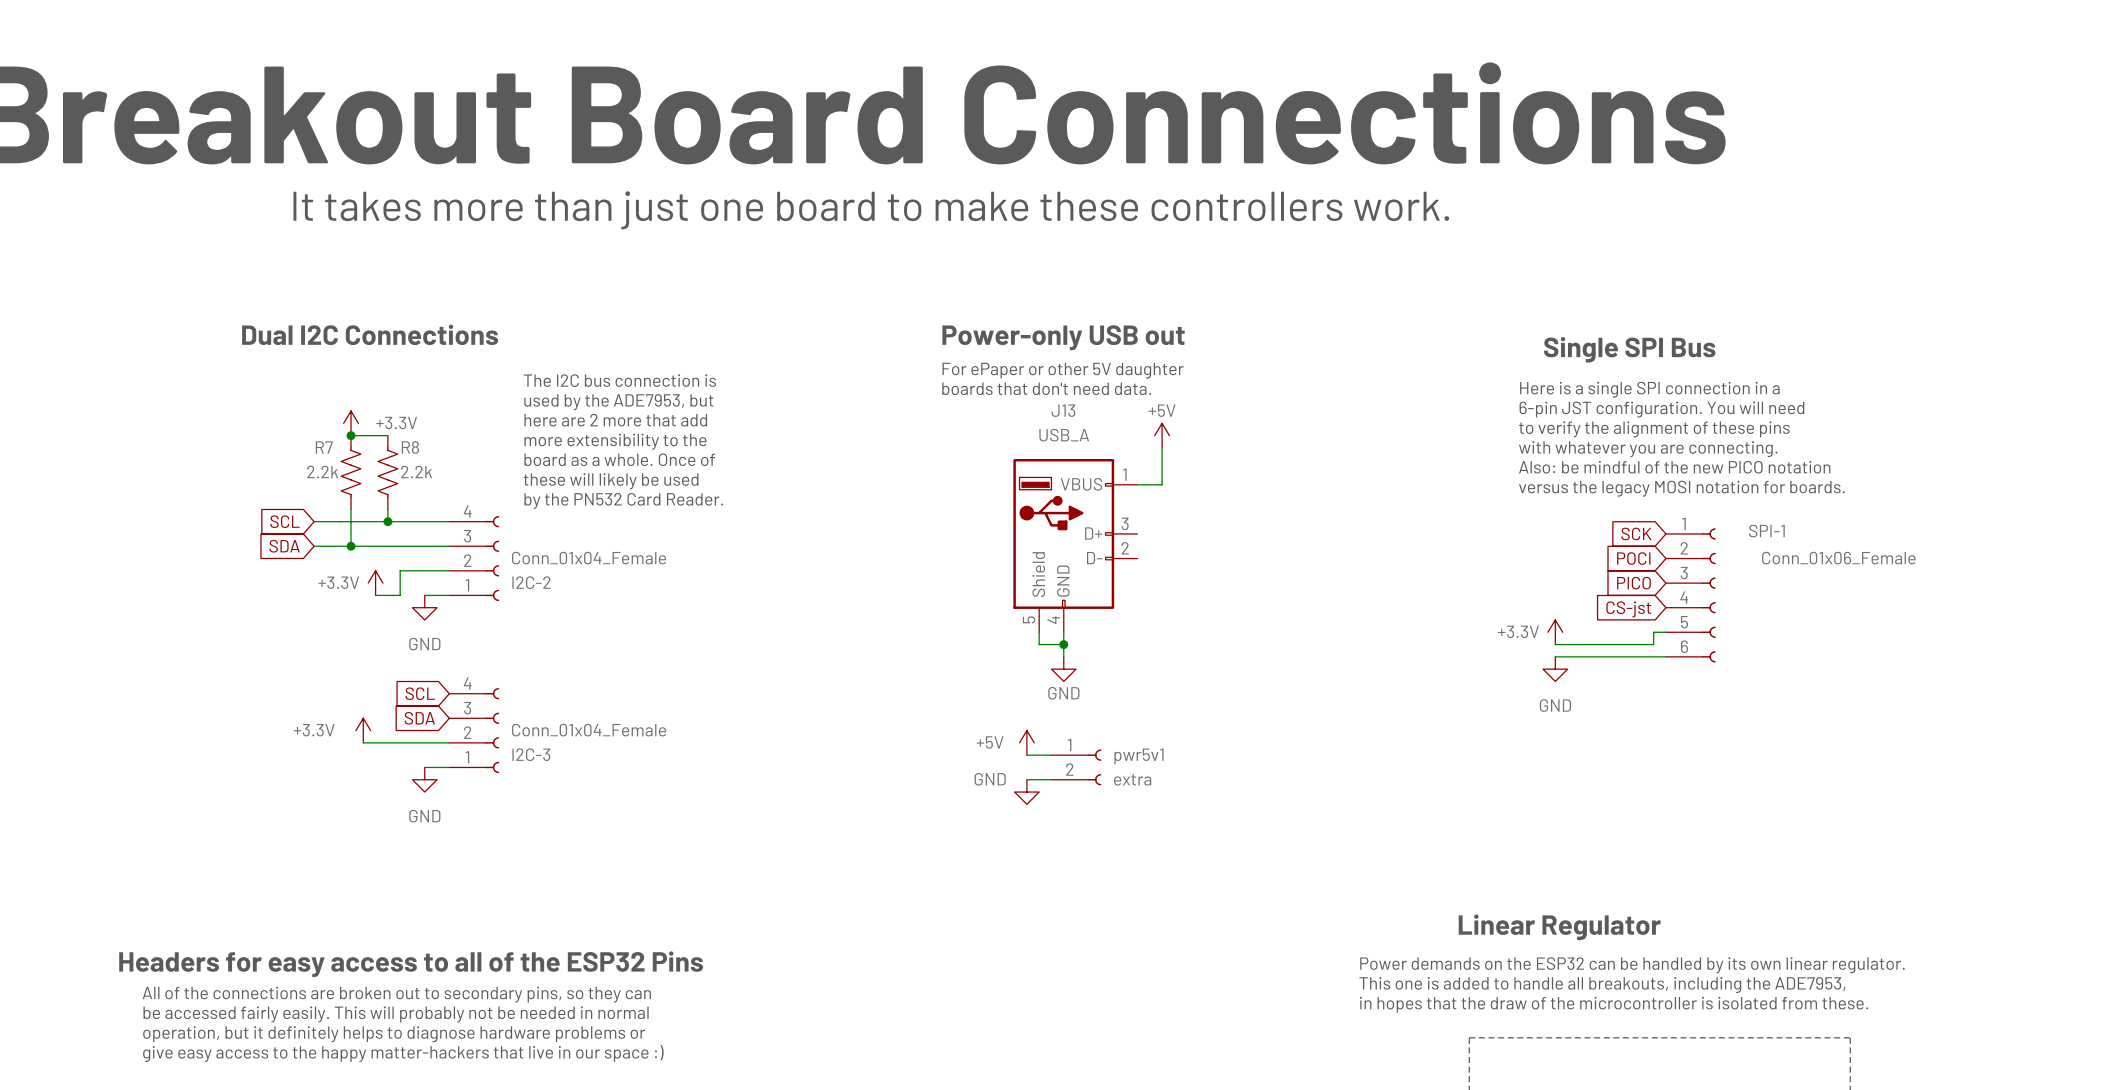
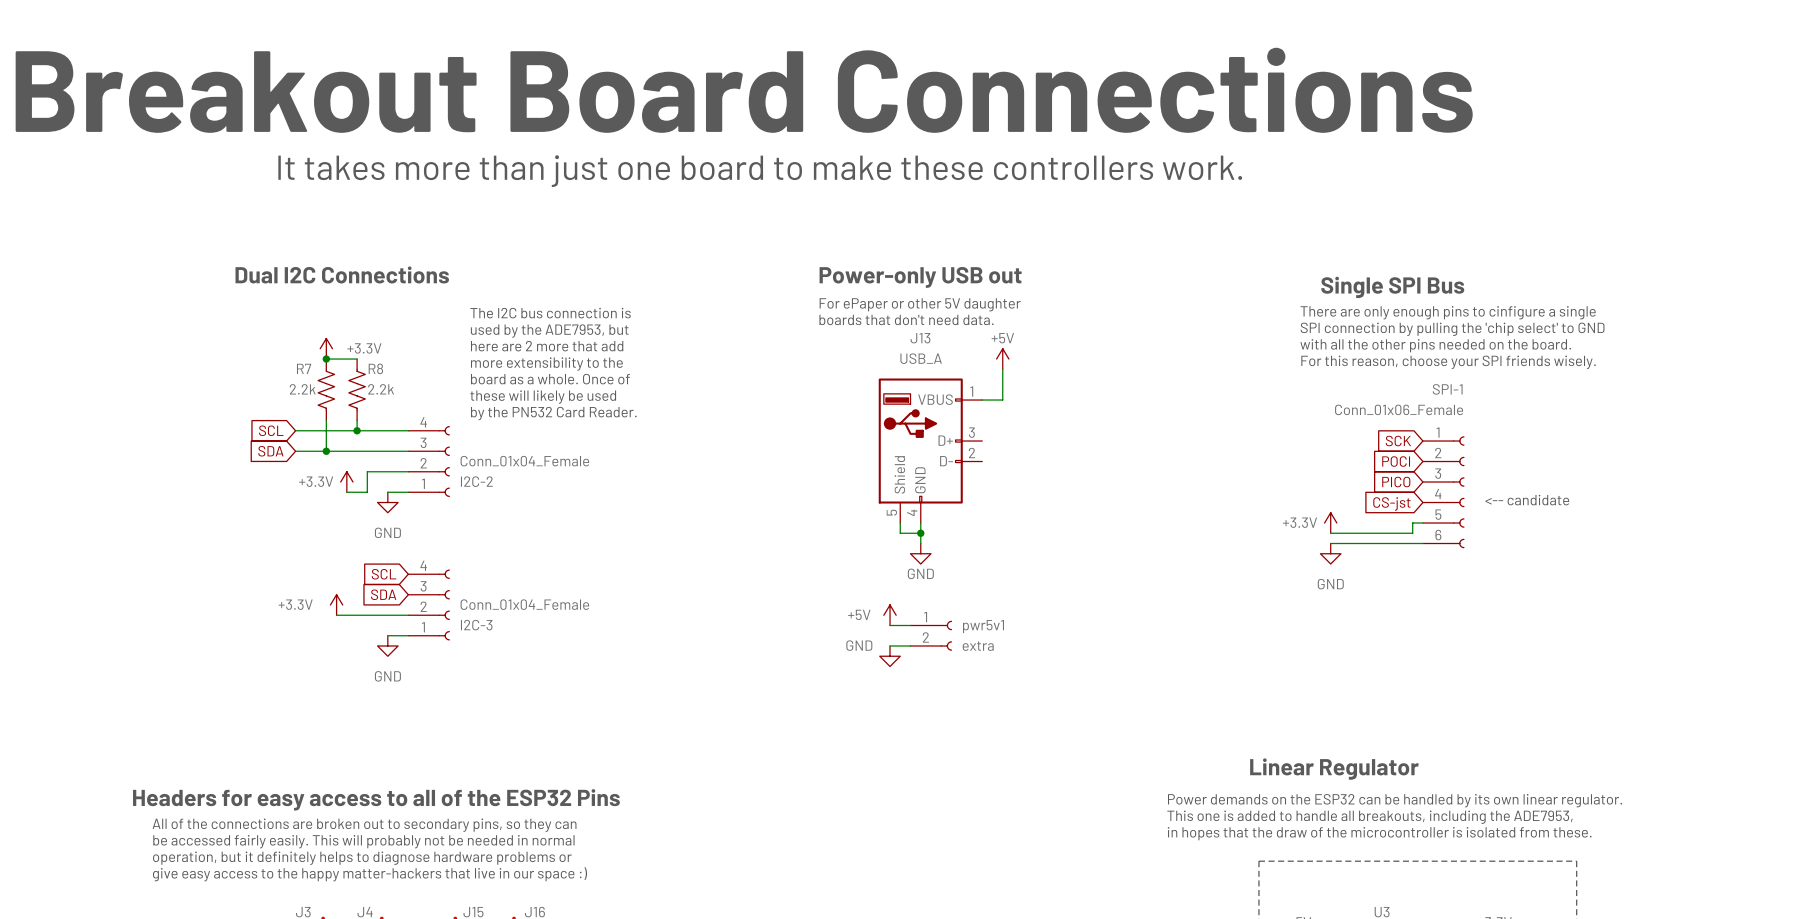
text: none -> There are only enough pins to cinfigure a single (1448, 312)
text: Here is a single SPI connection in a (1649, 389) -> none
text: none -> SPI connection by pulling the 'chip select' to GND (1452, 329)
text: 6-pin JST configuration. You will need (1661, 409) -> none
text: none -> with all the other pins needed on the board. (1435, 345)
text: to verify the alignment of these pins (1654, 429) -> none
text: none -> For this reason, choose your SPI friends wisely. (1448, 362)
text: with whatever you are connecting. (1648, 449) -> none
text: Also: be mindful of the new PICO notation (1674, 467) -> none
text: versus the legacy MOSI notation for boards. (1681, 488) -> none
SPI-1 name position: SPI-1 (1766, 531) -> SPI-1 (1447, 389)
SPI-1 value position: Conn_01x06_Female (1838, 558) -> Conn_01x06_Female (1399, 409)
text: none -> <-- candidate (1527, 500)

